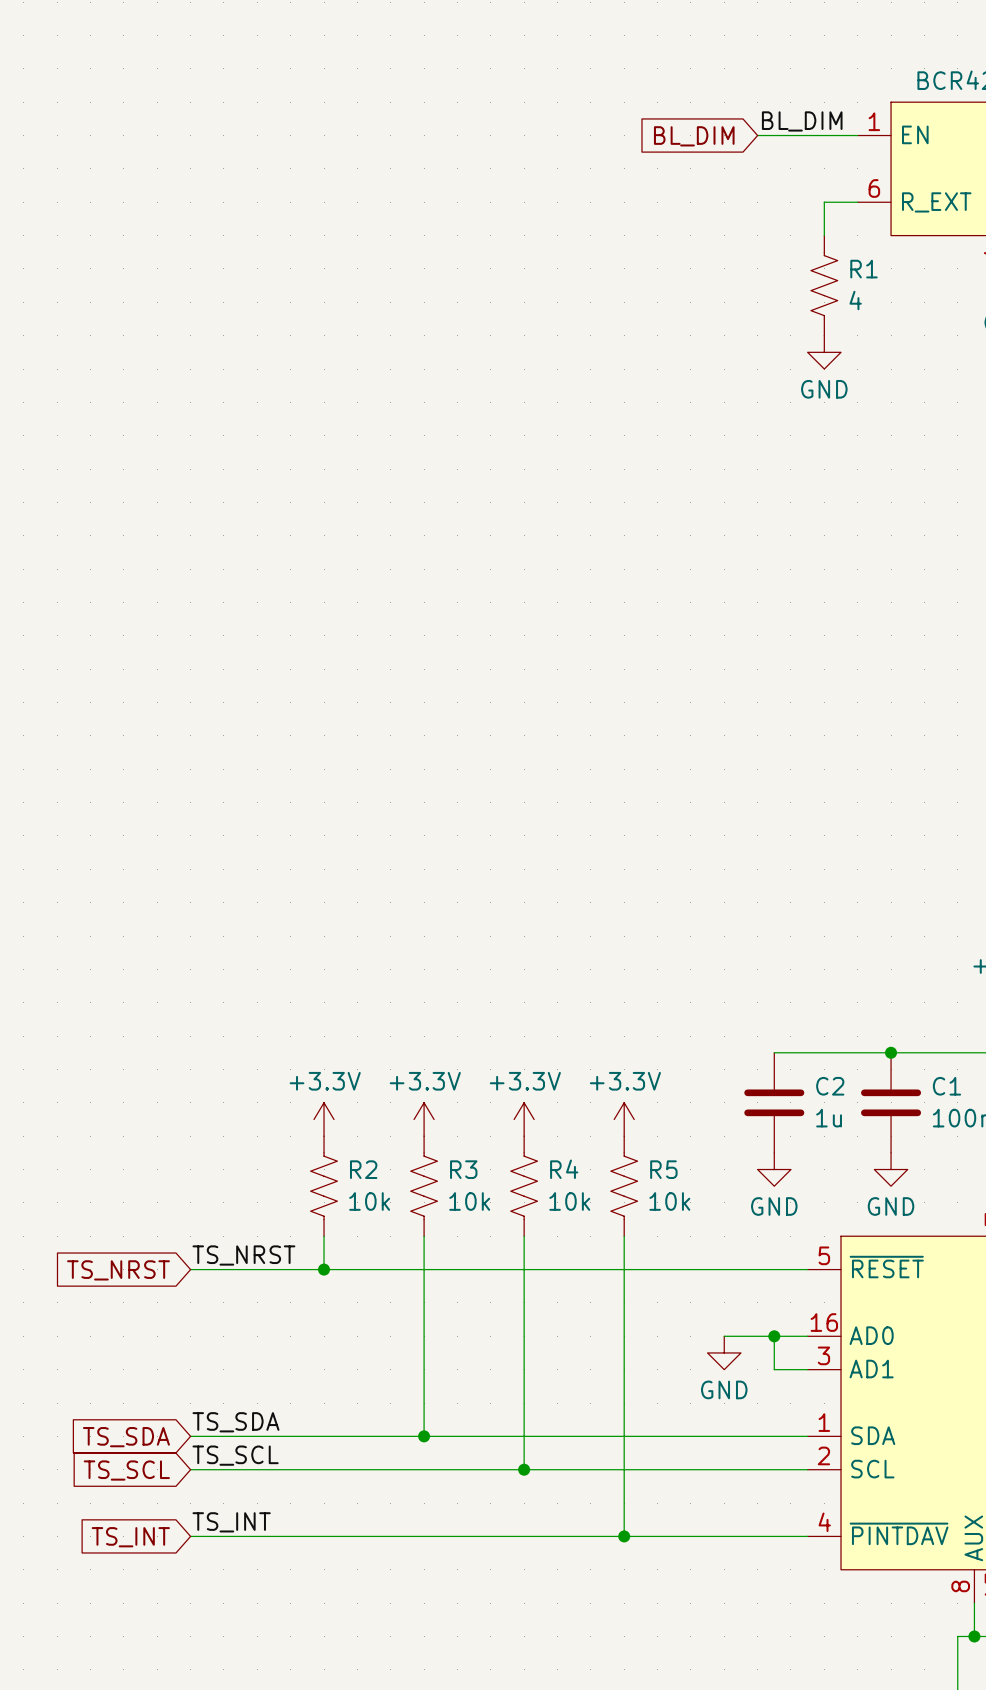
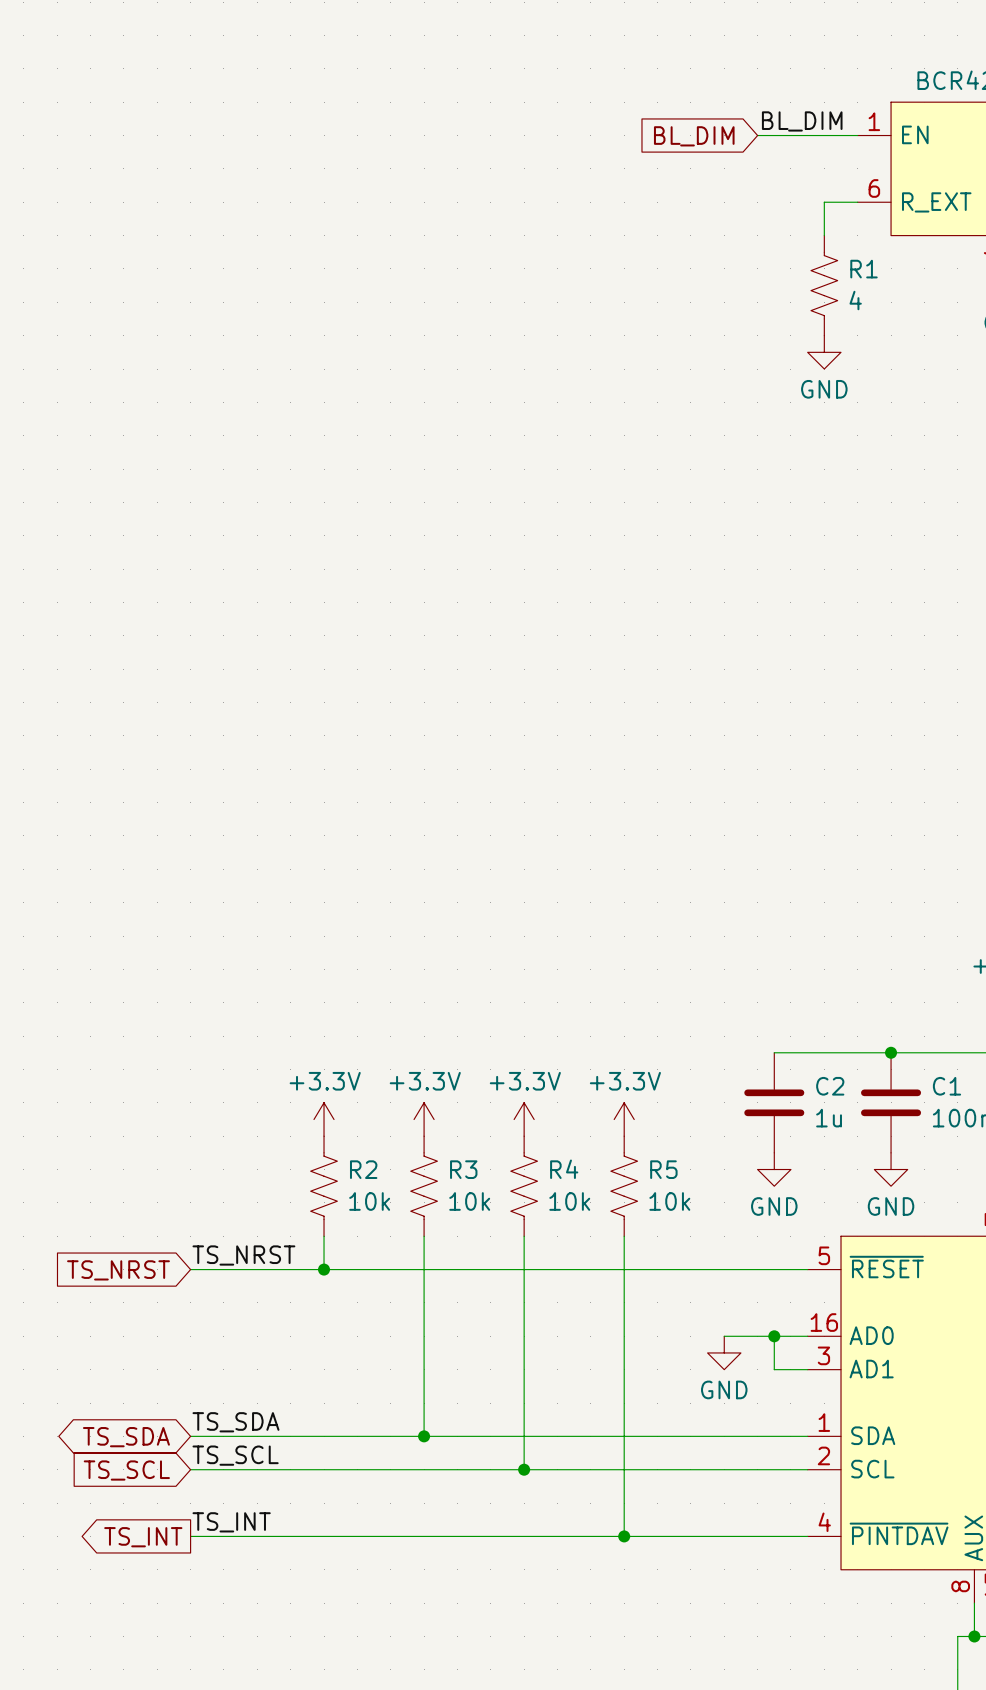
global label shape: input (126, 1437) -> bidirectional (126, 1437)
global label shape: input (130, 1537) -> output (143, 1537)

